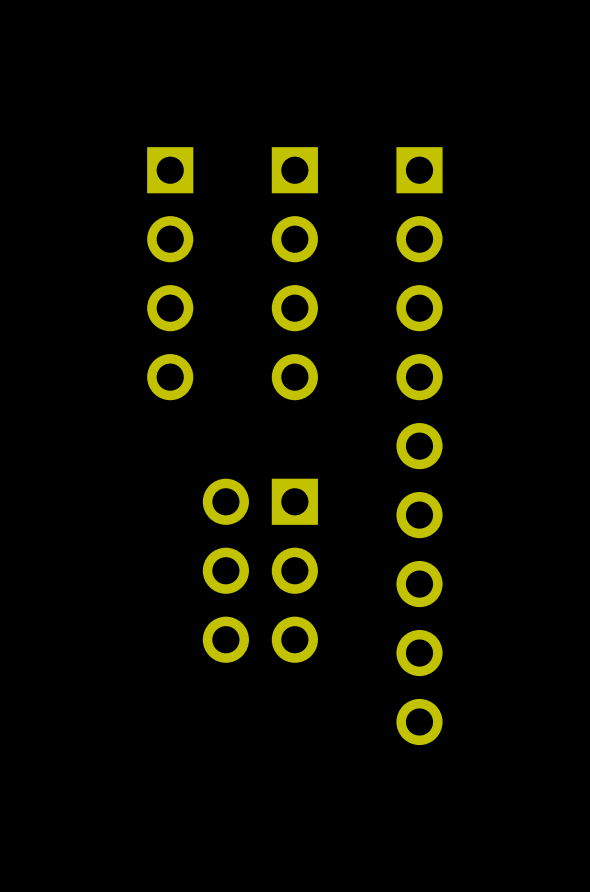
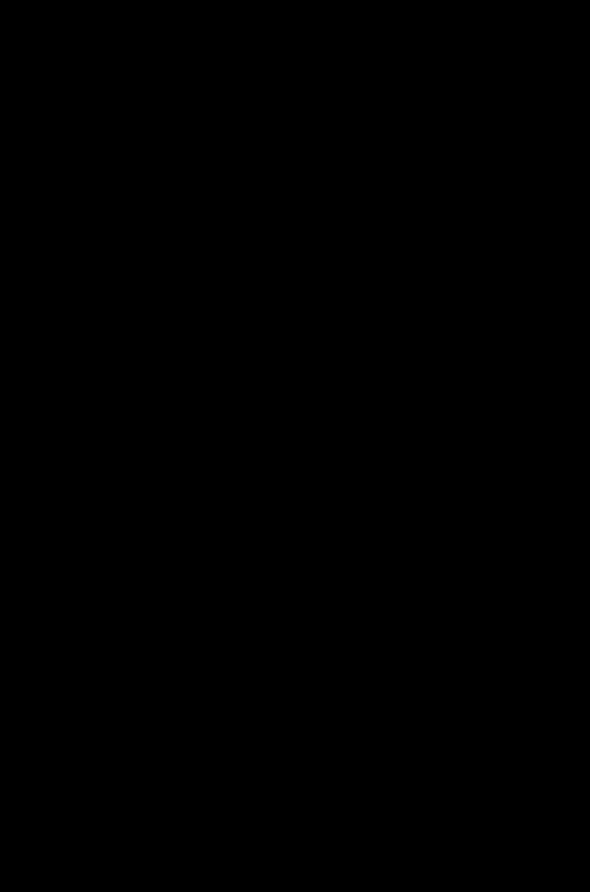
part: (170, 273) -> none
part: (294, 273) -> none
part: (419, 446) -> none
part: (260, 570) -> none

